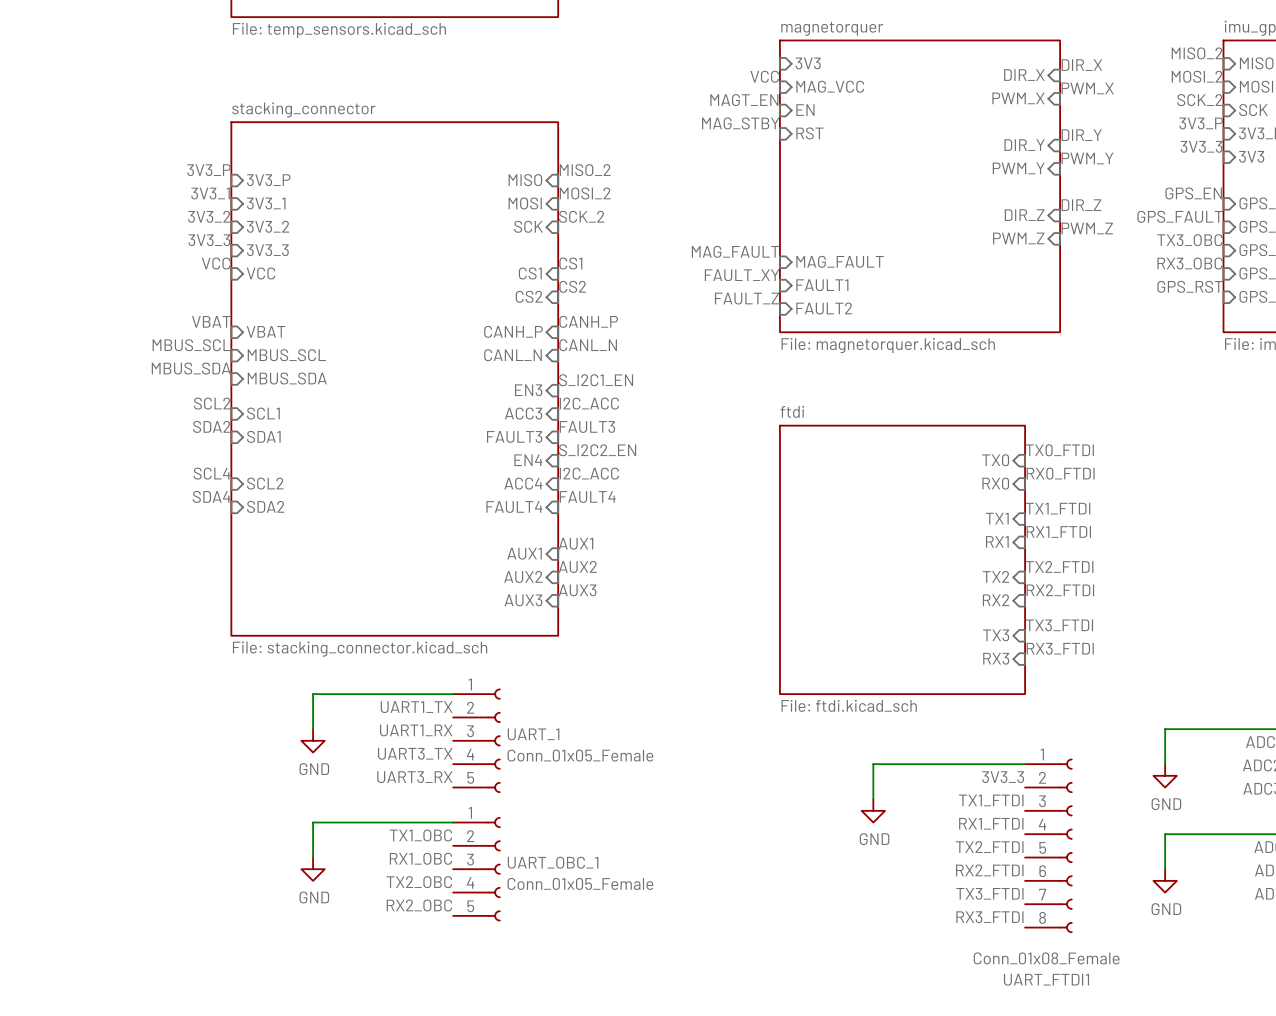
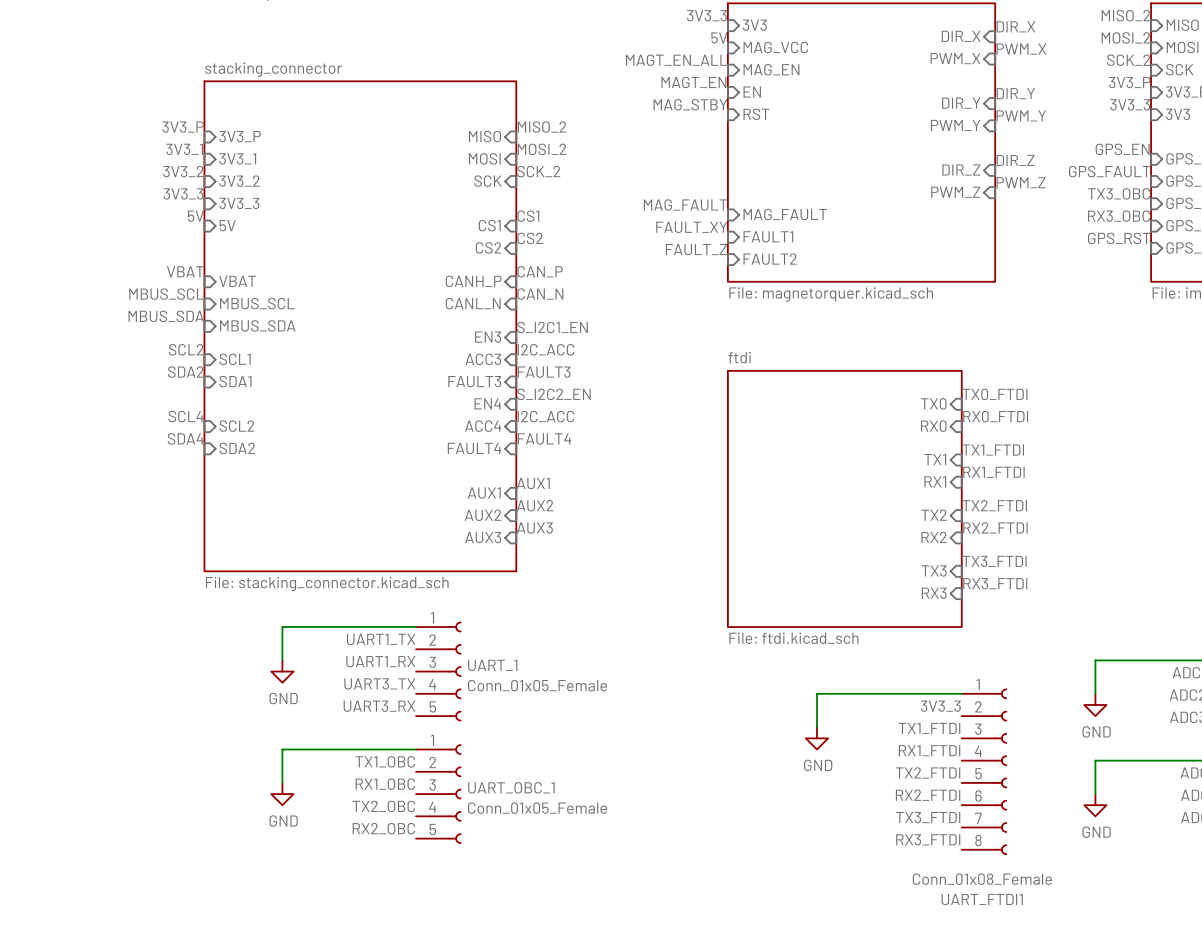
label: none -> 3V3_3 (706, 15)
label: VCC (764, 76) -> 5V (719, 38)
label: MAGT_EN (744, 100) -> MAGT_EN_ALL (676, 60)
sheet pin: EN (805, 110) -> MAG_EN (771, 69)
label: MAG_STBY (740, 123) -> MAGT_EN (693, 82)
sheet pin: RST (809, 133) -> EN (752, 92)
label: none -> MAG_STBY (690, 104)
sheet pin: none -> RST (756, 114)
label: VCC (216, 263) -> 5V (195, 216)
sheet pin: VCC (260, 273) -> 5V (227, 225)
label: CANH_P (588, 321) -> CAN_P (540, 271)
label: CANL_N (588, 345) -> CAN_N (540, 294)

